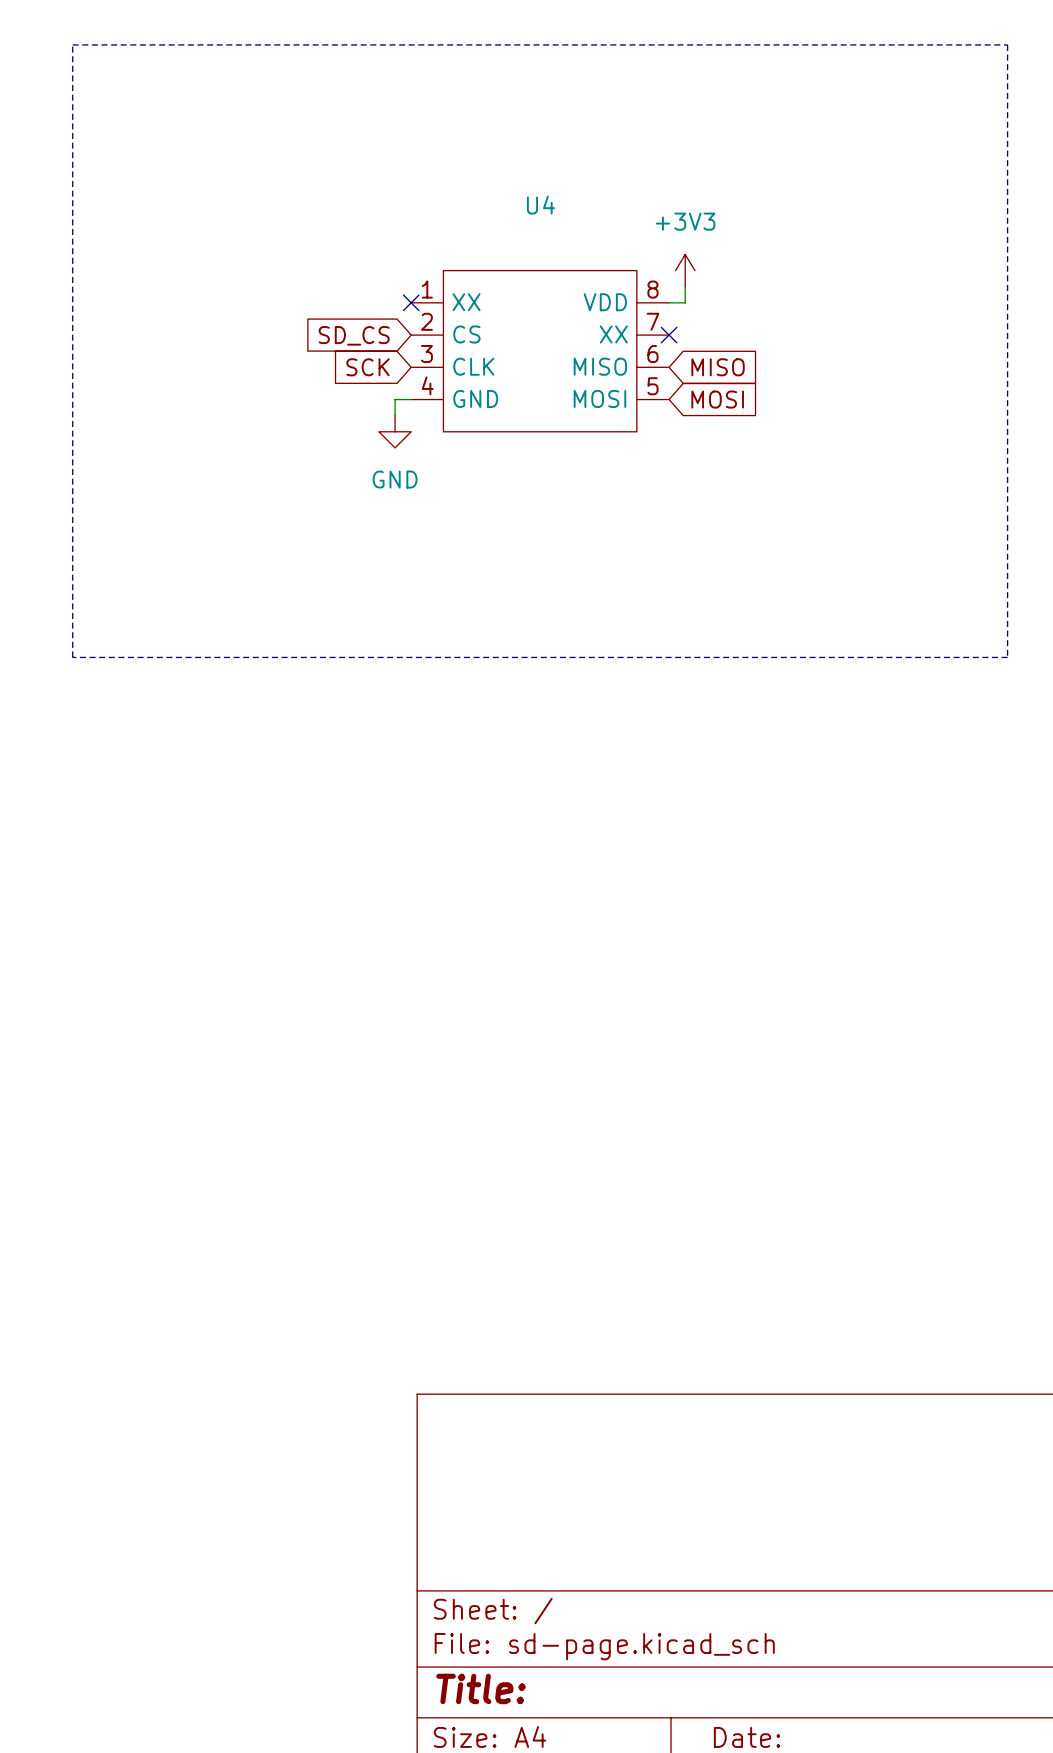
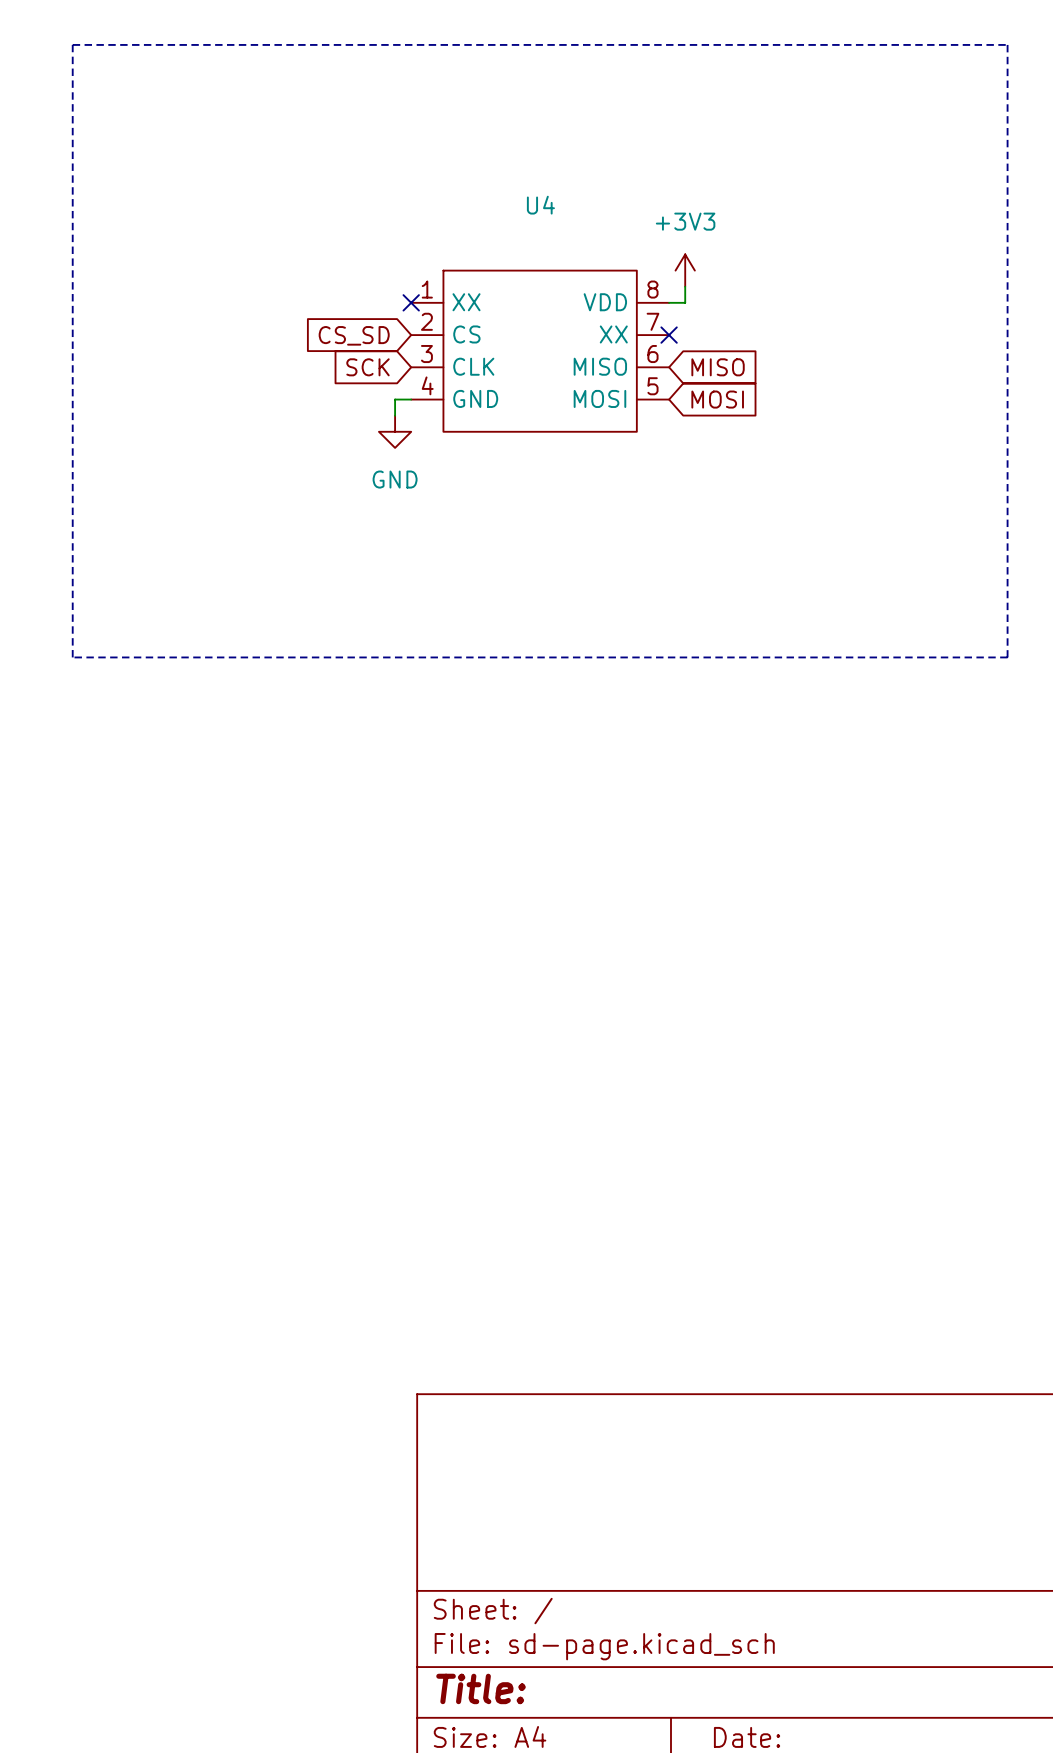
global label: SD_CS (354, 335) -> CS_SD (354, 335)

